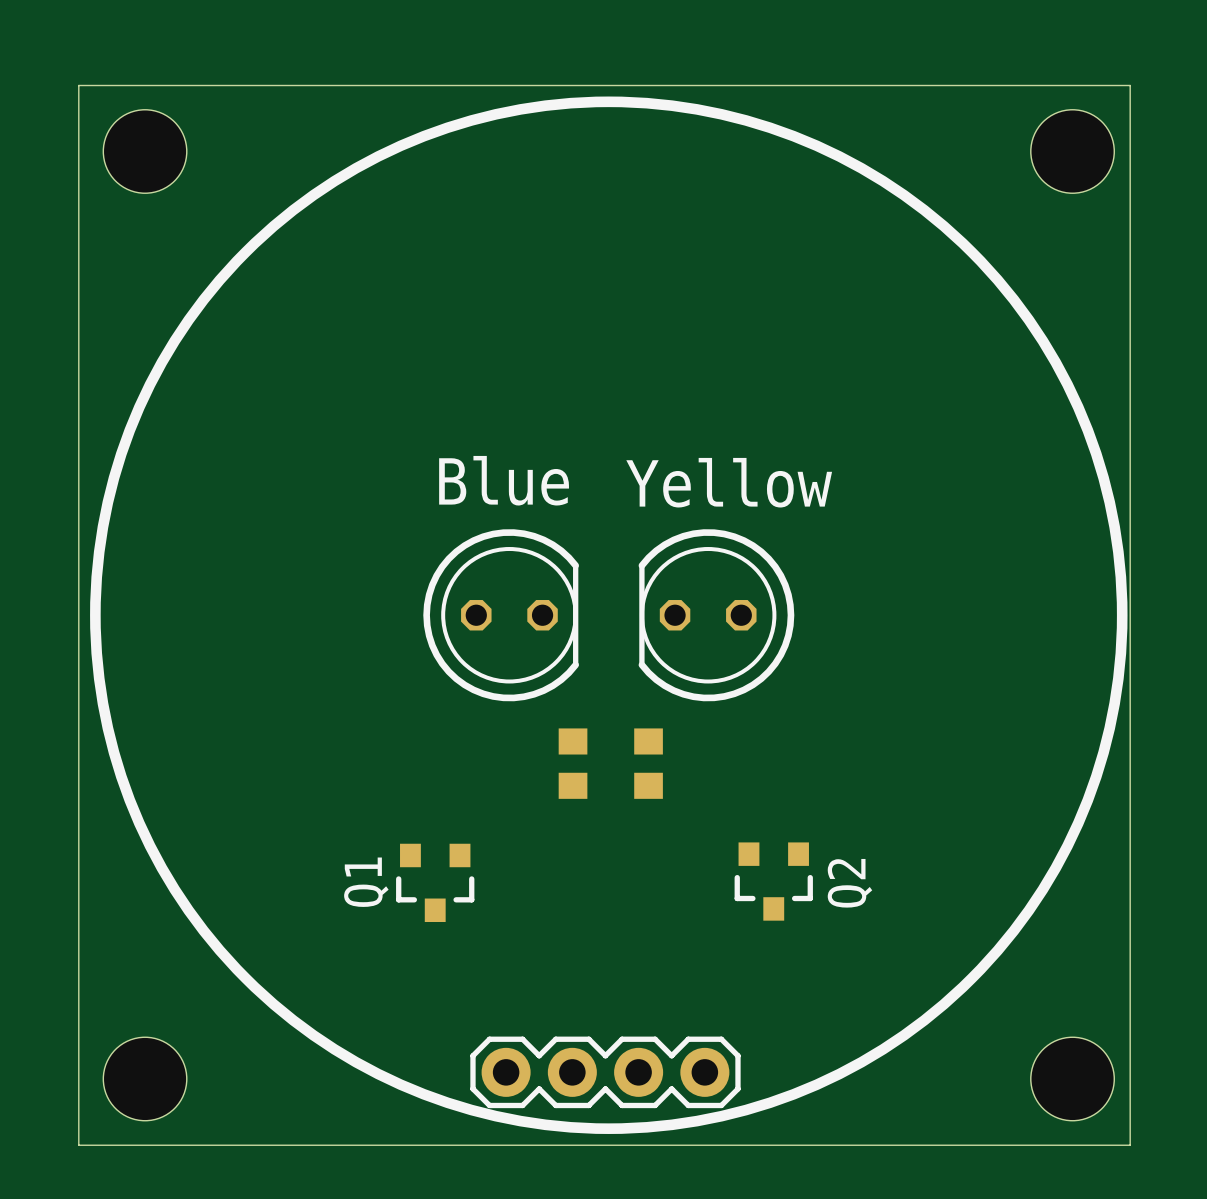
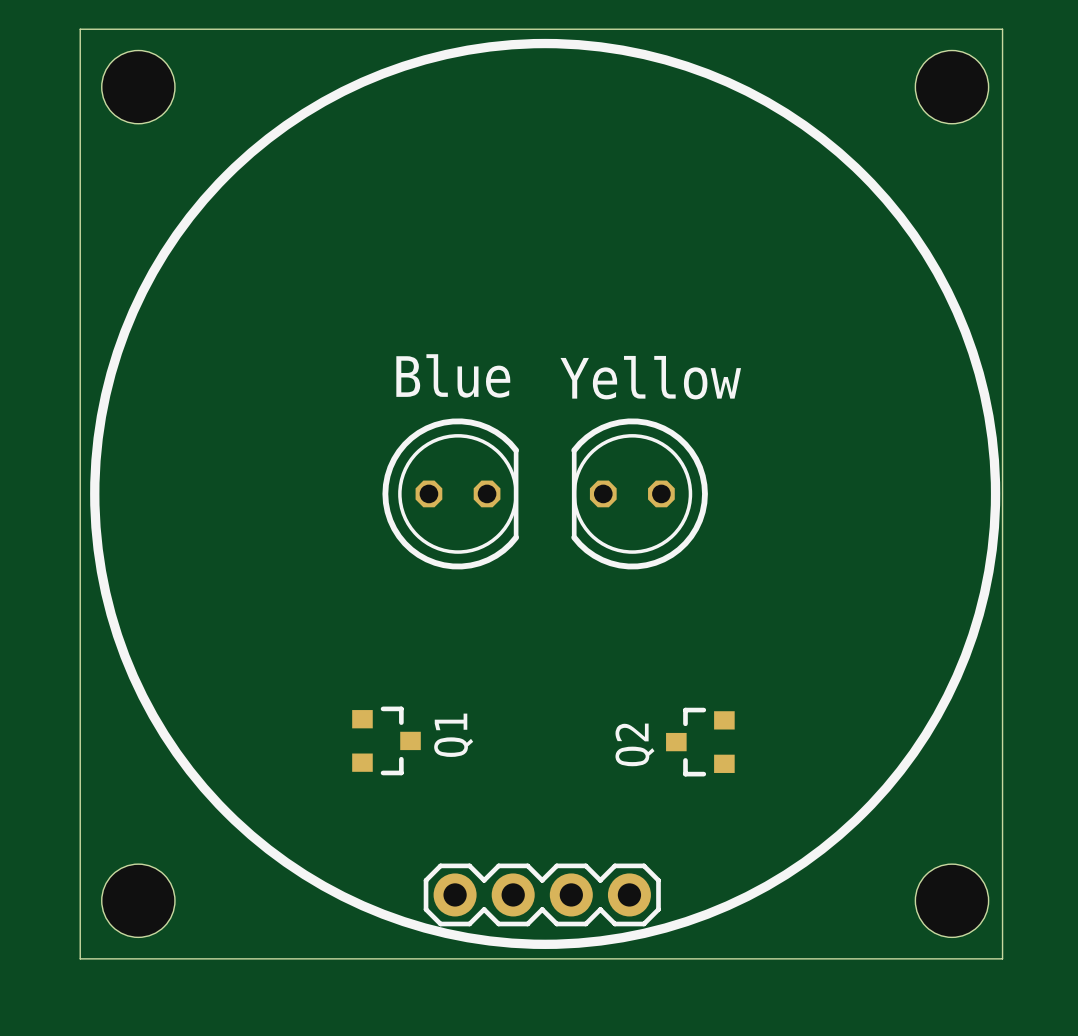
part: (573, 763) -> none
part: (648, 763) -> none
Q2 rotation: 0° (773, 881) -> 90° clockwise (700, 742)
Q1 name position: Q1 (366, 882) -> Q1 (453, 735)
Q1 rotation: 0° (435, 882) -> 90° counterclockwise (386, 740)
Q2 name position: Q2 (849, 883) -> Q2 (634, 744)

